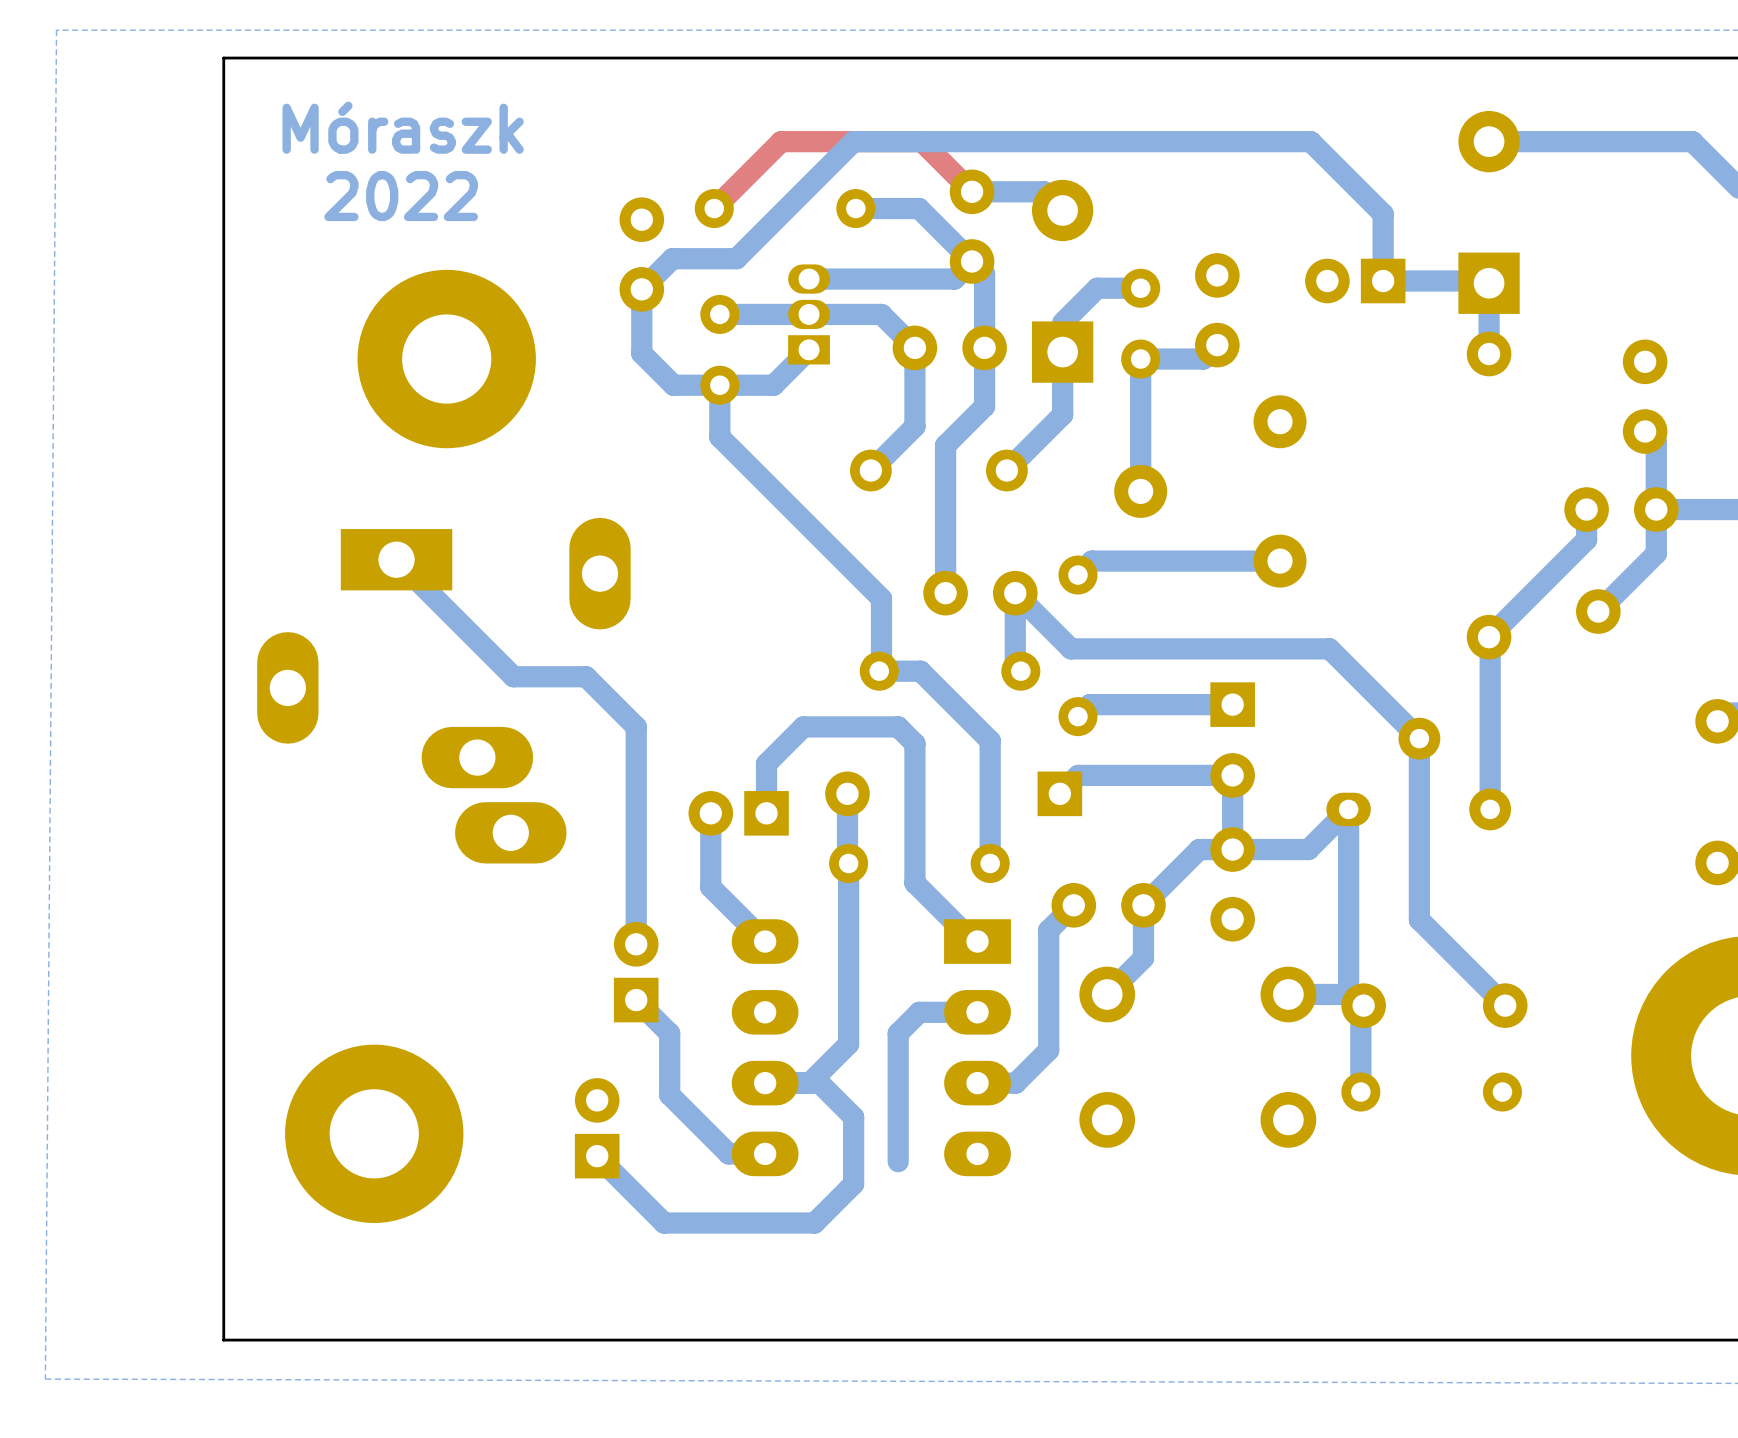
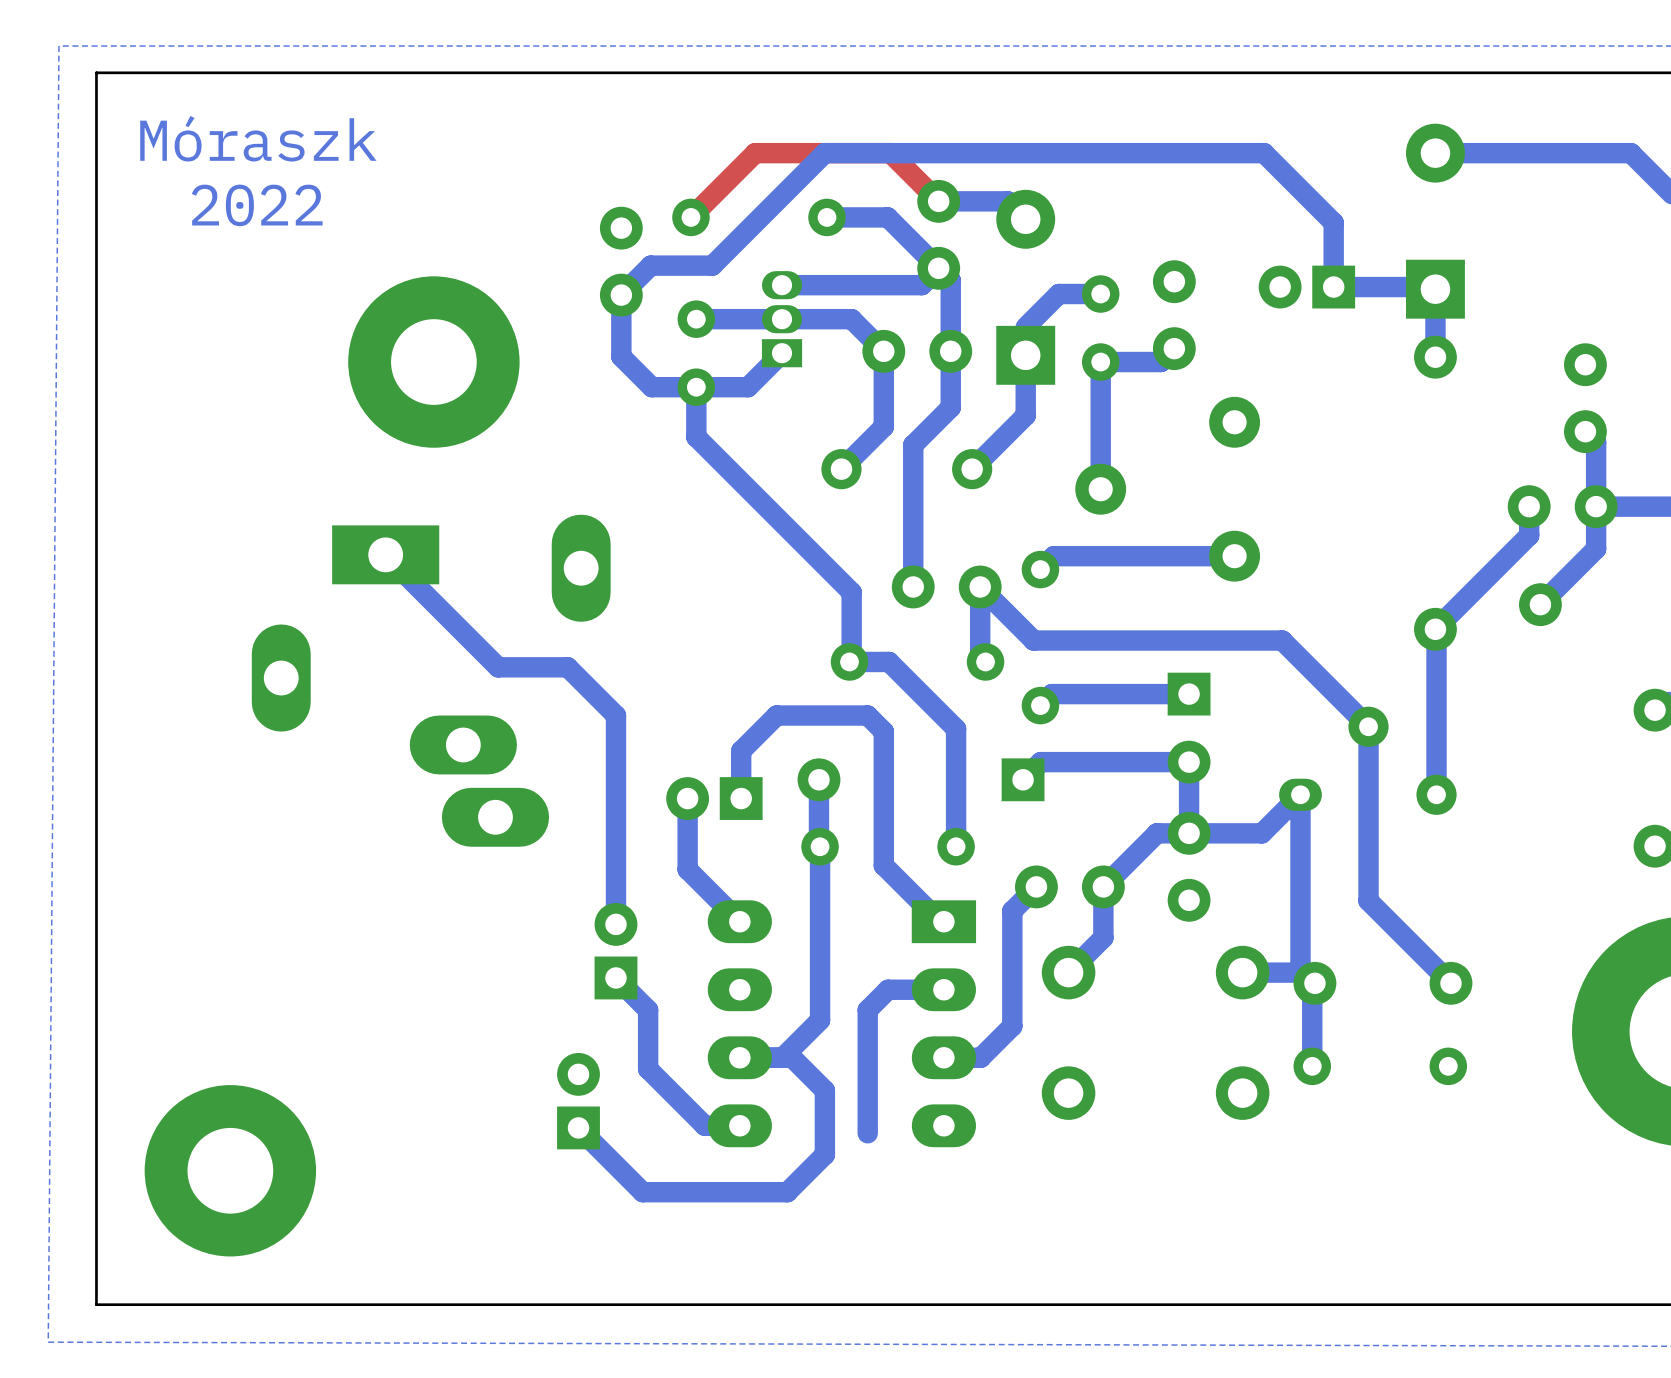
board edge: (223, 58) (223, 1340) -> (219, 72) (96, 72) (96, 1304) (219, 1304)
text position: Móraszk (403, 127) -> Móraszk (258, 138)
text position: 2022 (401, 196) -> 2022 (257, 205)
part position: (374, 1133) -> (230, 1170)

